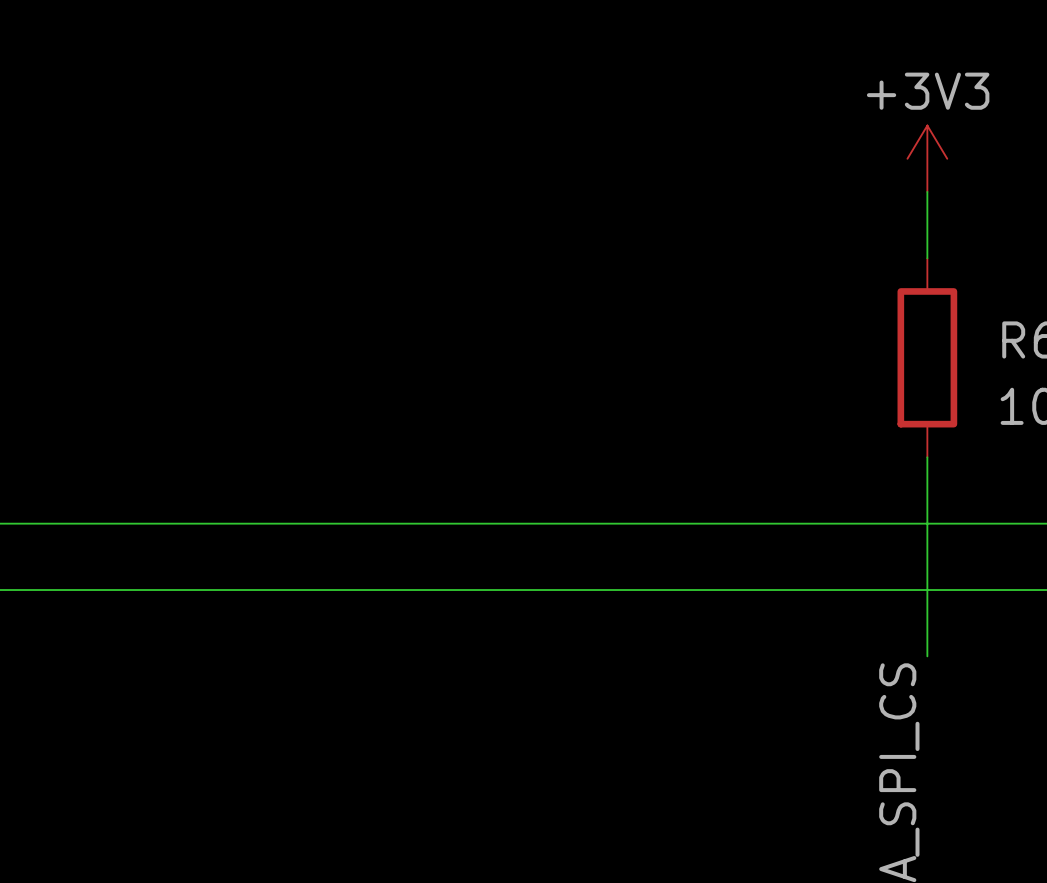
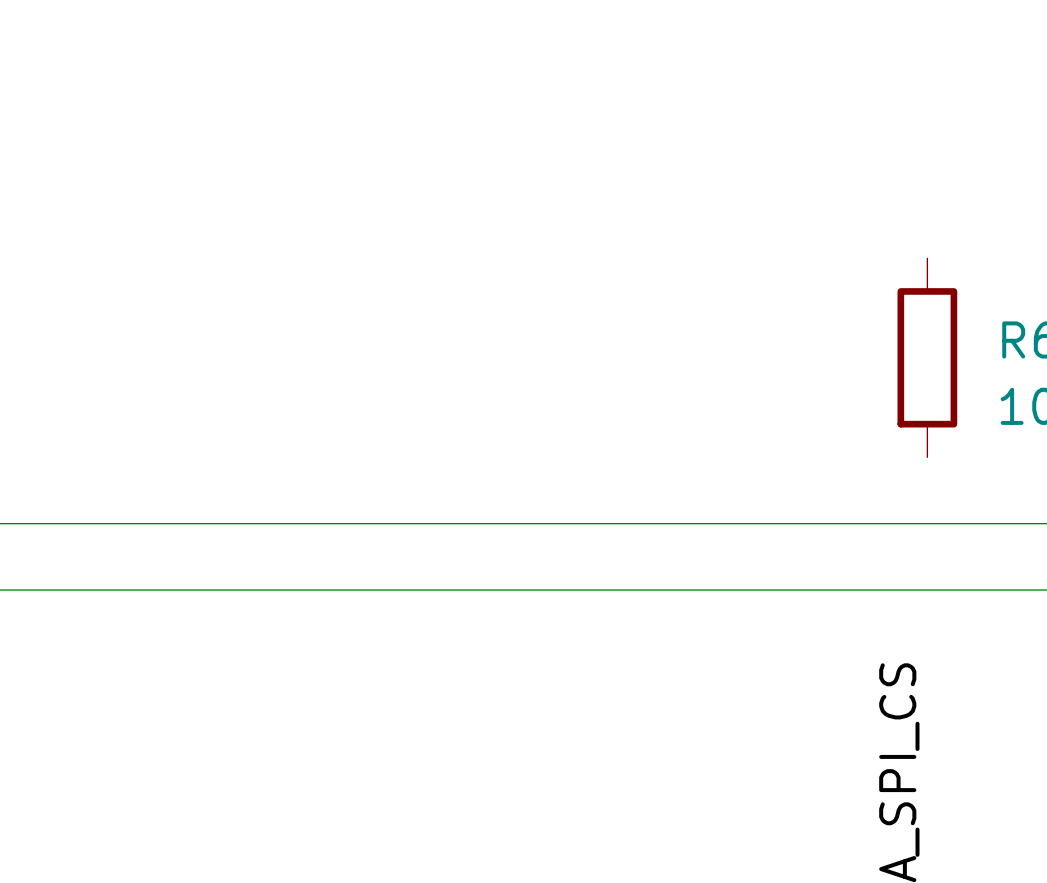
power symbol: +3V3 (927, 158) -> none
wire: (927, 191) (927, 258) -> none
wire: (927, 457) (927, 656) -> none

